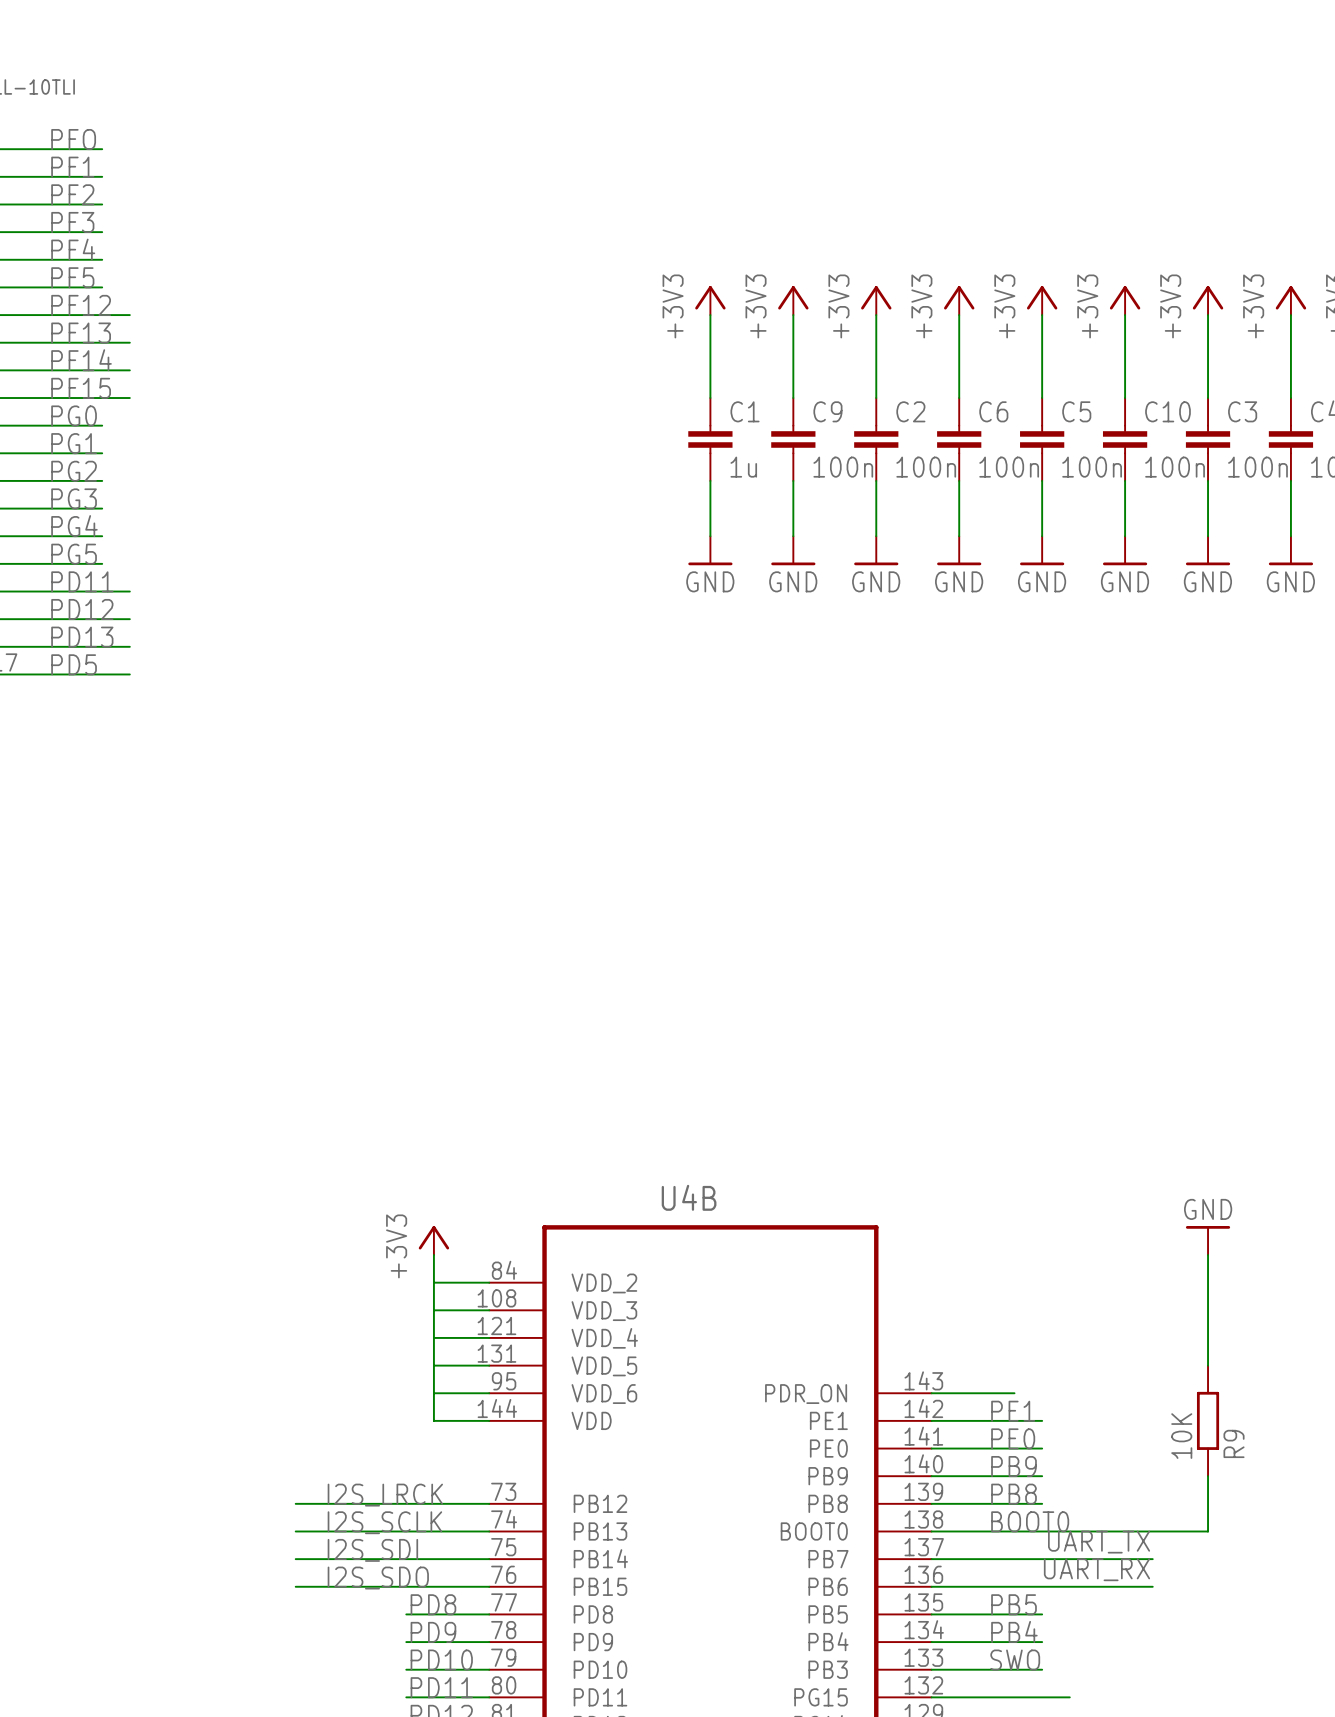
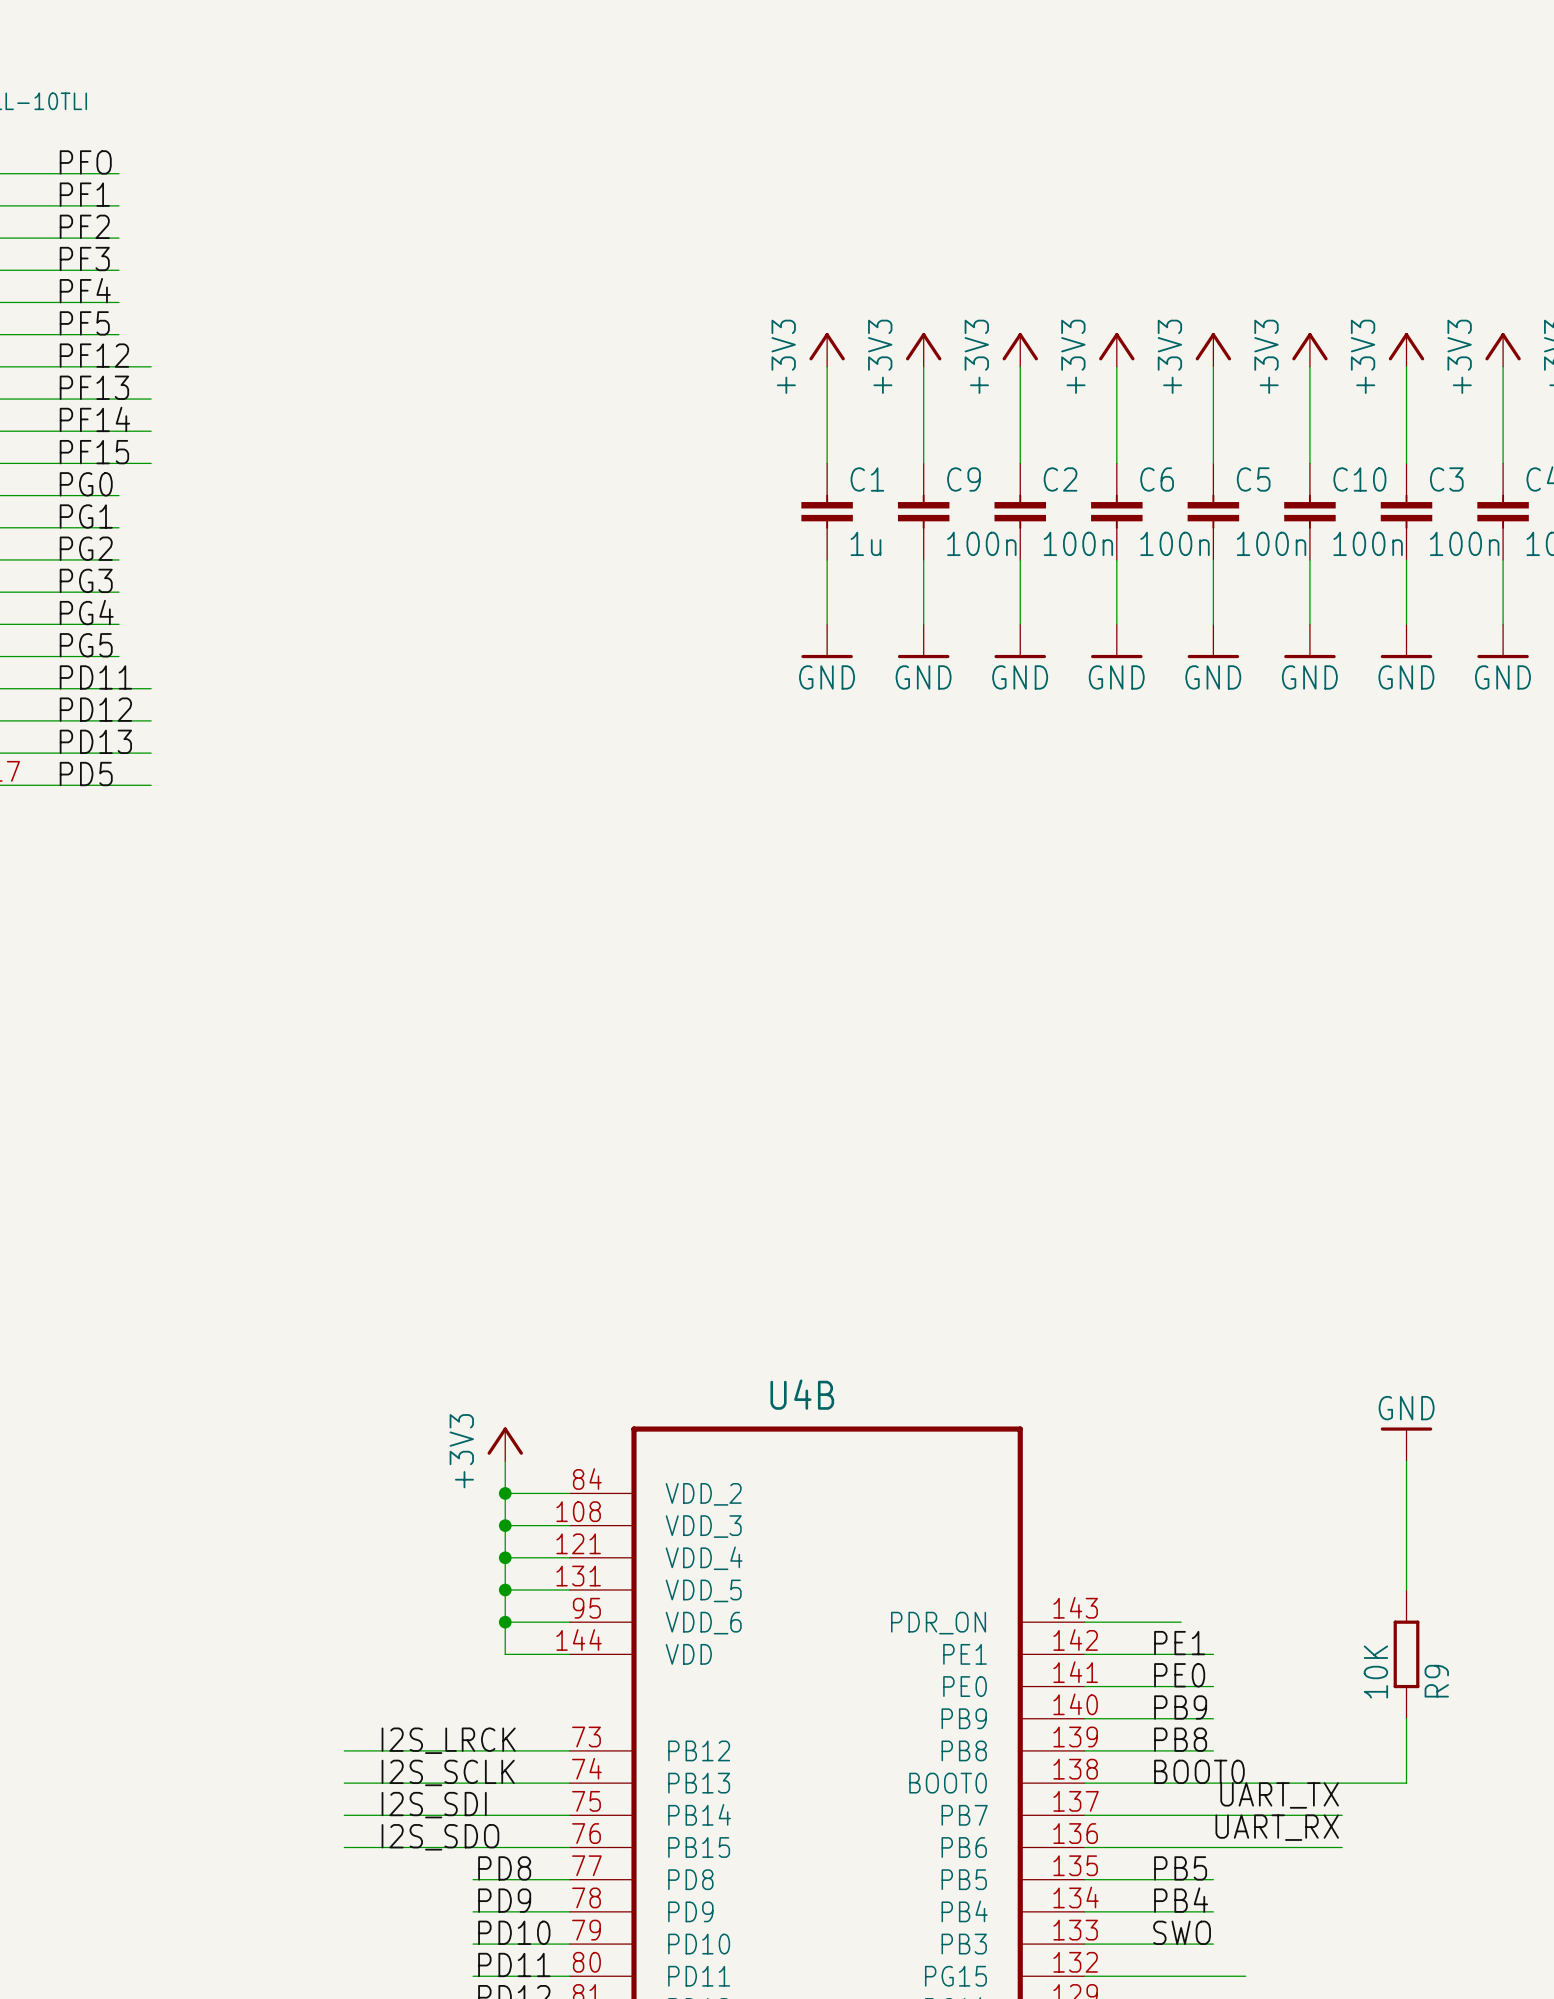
junction: none -> (505, 1493)
junction: none -> (505, 1525)
junction: none -> (505, 1557)
junction: none -> (505, 1589)
junction: none -> (505, 1622)

